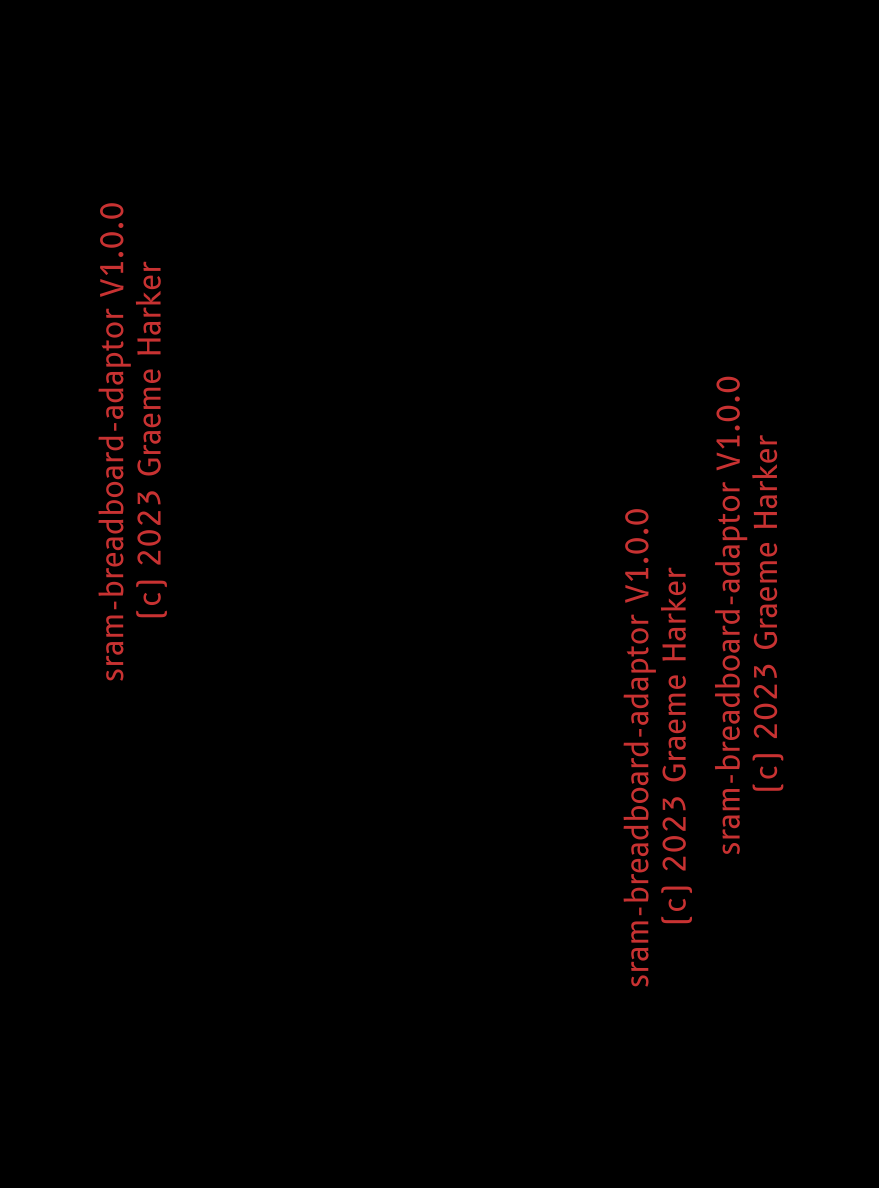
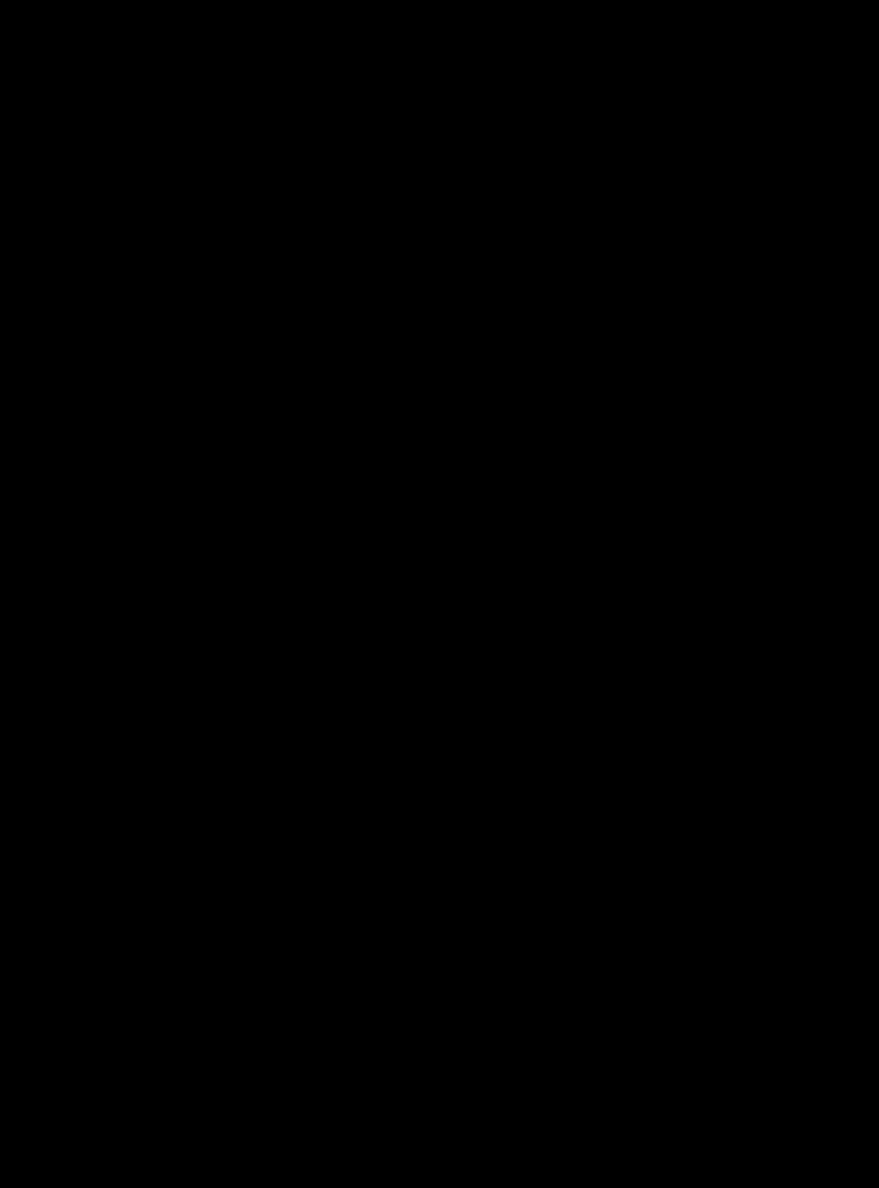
text: (c) 2023 Graeme Harker (151, 439) -> none
text: sram-breadboard-adaptor V1.0.0 (114, 441) -> none
text: (c) 2023 Graeme Harker (767, 612) -> none
text: sram-breadboard-adaptor V1.0.0 (731, 615) -> none
text: (c) 2023 Graeme Harker (676, 745) -> none
text: sram-breadboard-adaptor V1.0.0 (639, 747) -> none

